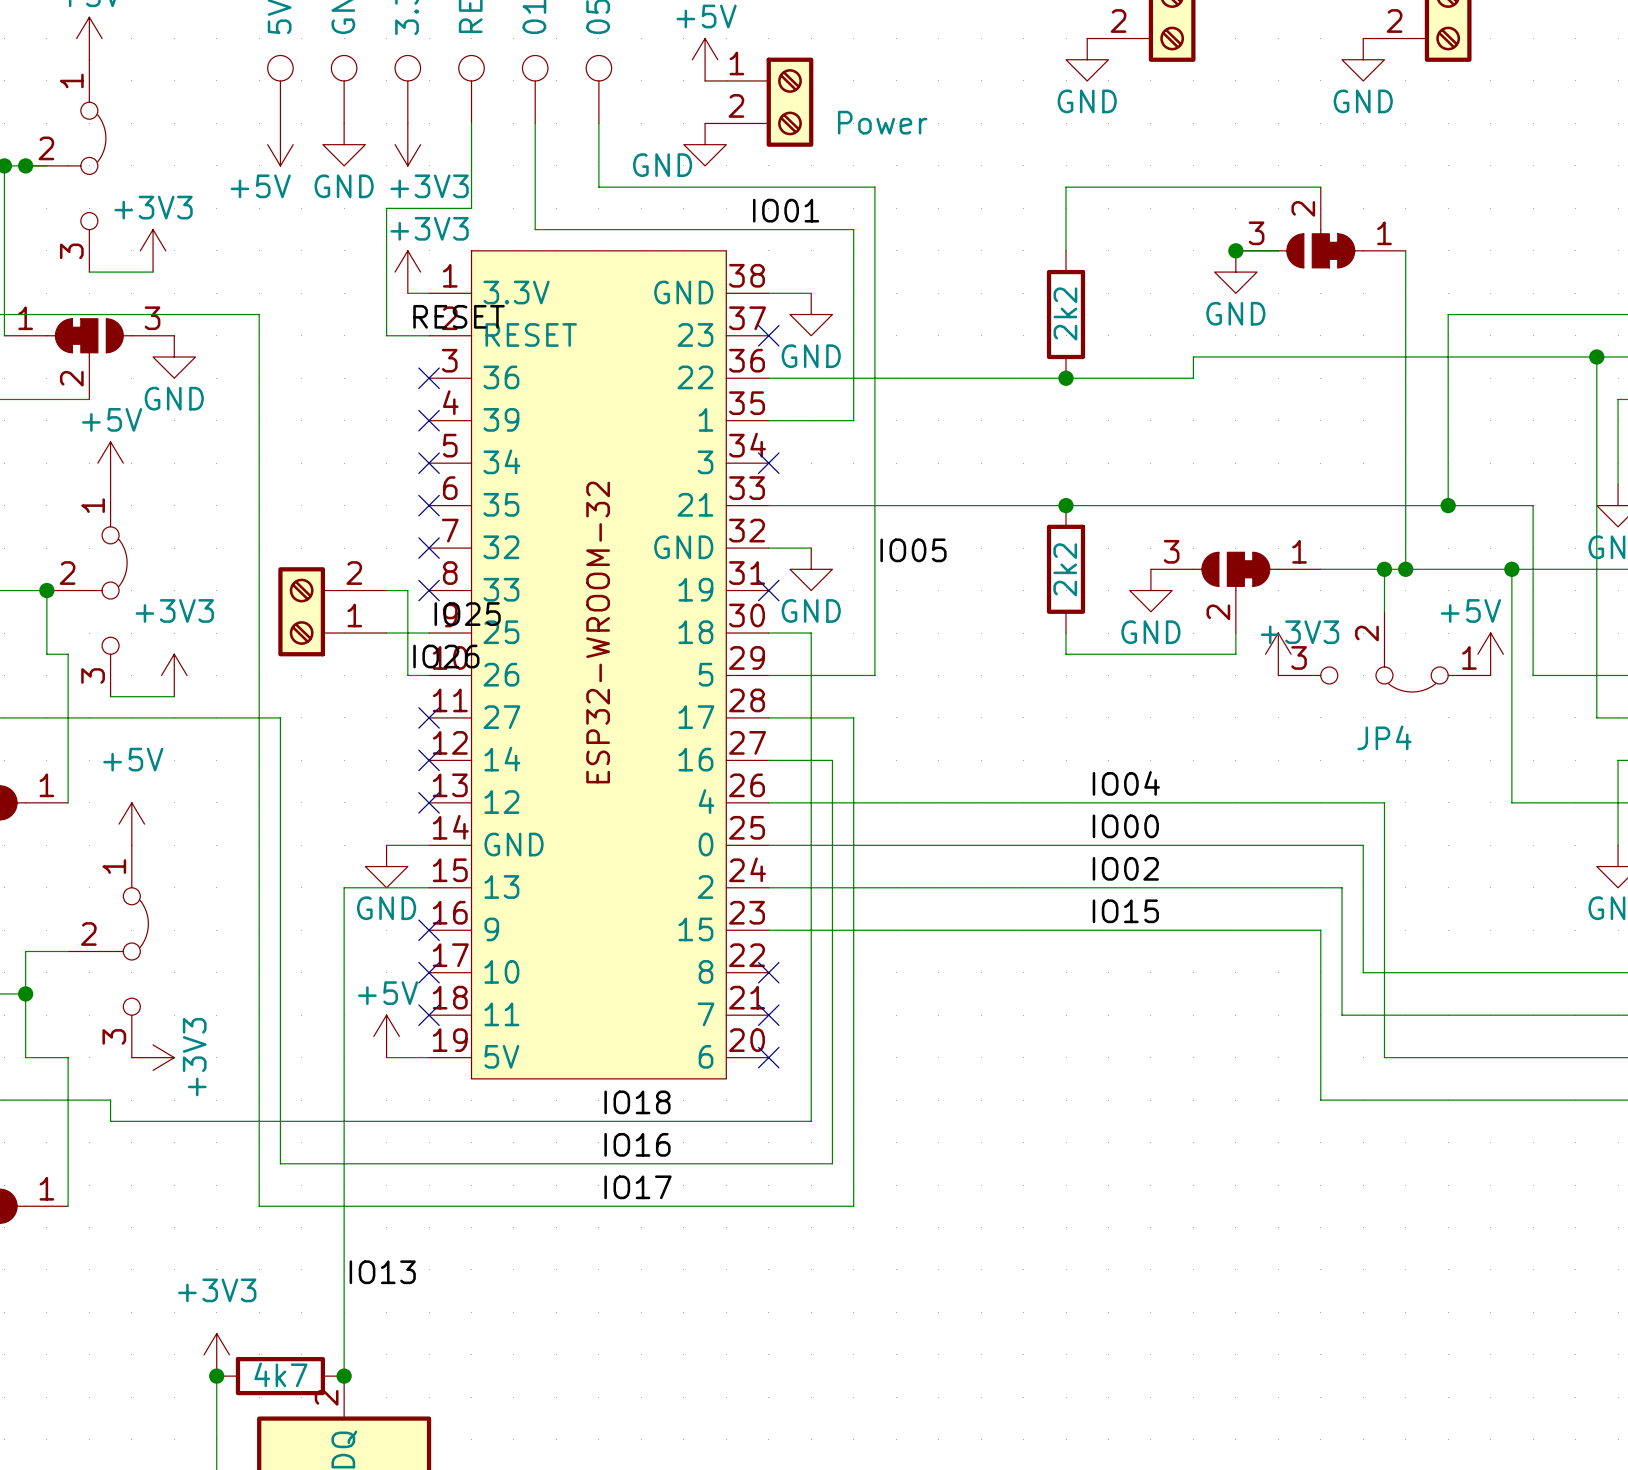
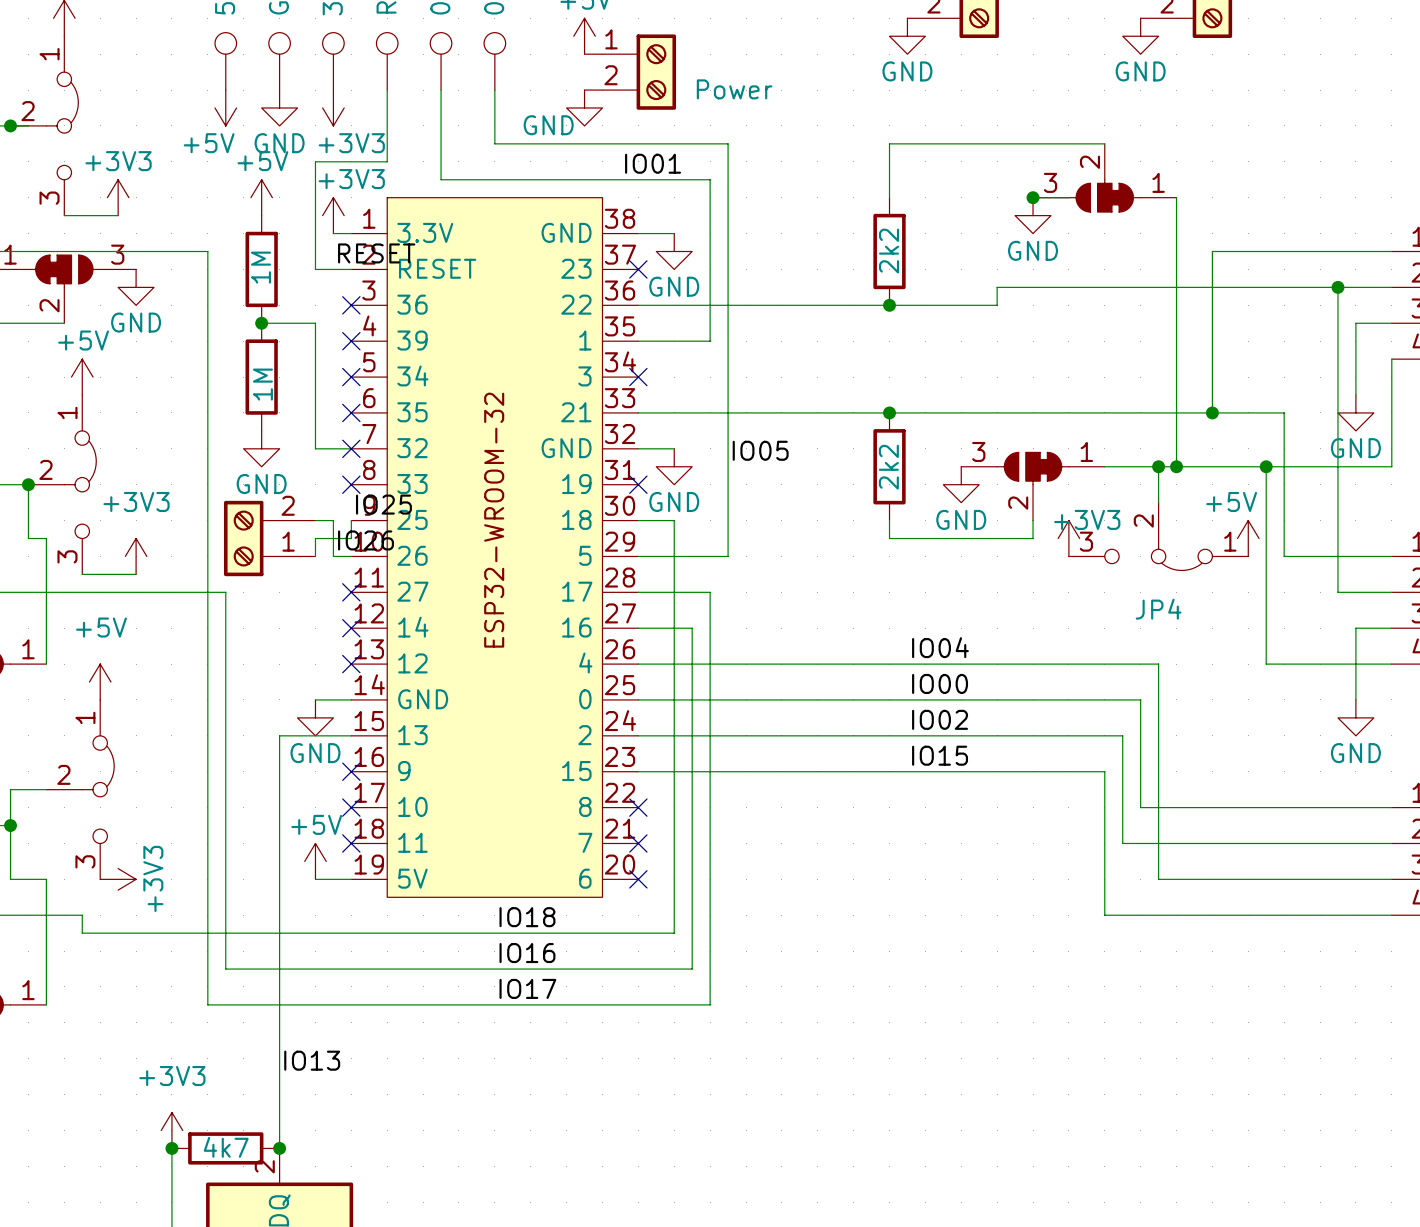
power symbol: none -> +5V (261, 197)
part: none -> 1M (261, 269)
wire: none -> (261, 323) (315, 323) (315, 448) (351, 448)
junction: none -> (261, 323)
part: none -> 1M (261, 377)
power symbol: none -> GND (261, 448)
wire: (386, 590) (407, 590) (407, 633) (429, 633) -> (315, 556) (315, 538) (351, 538) (351, 520)
part position: (332, 611) -> (269, 538)

